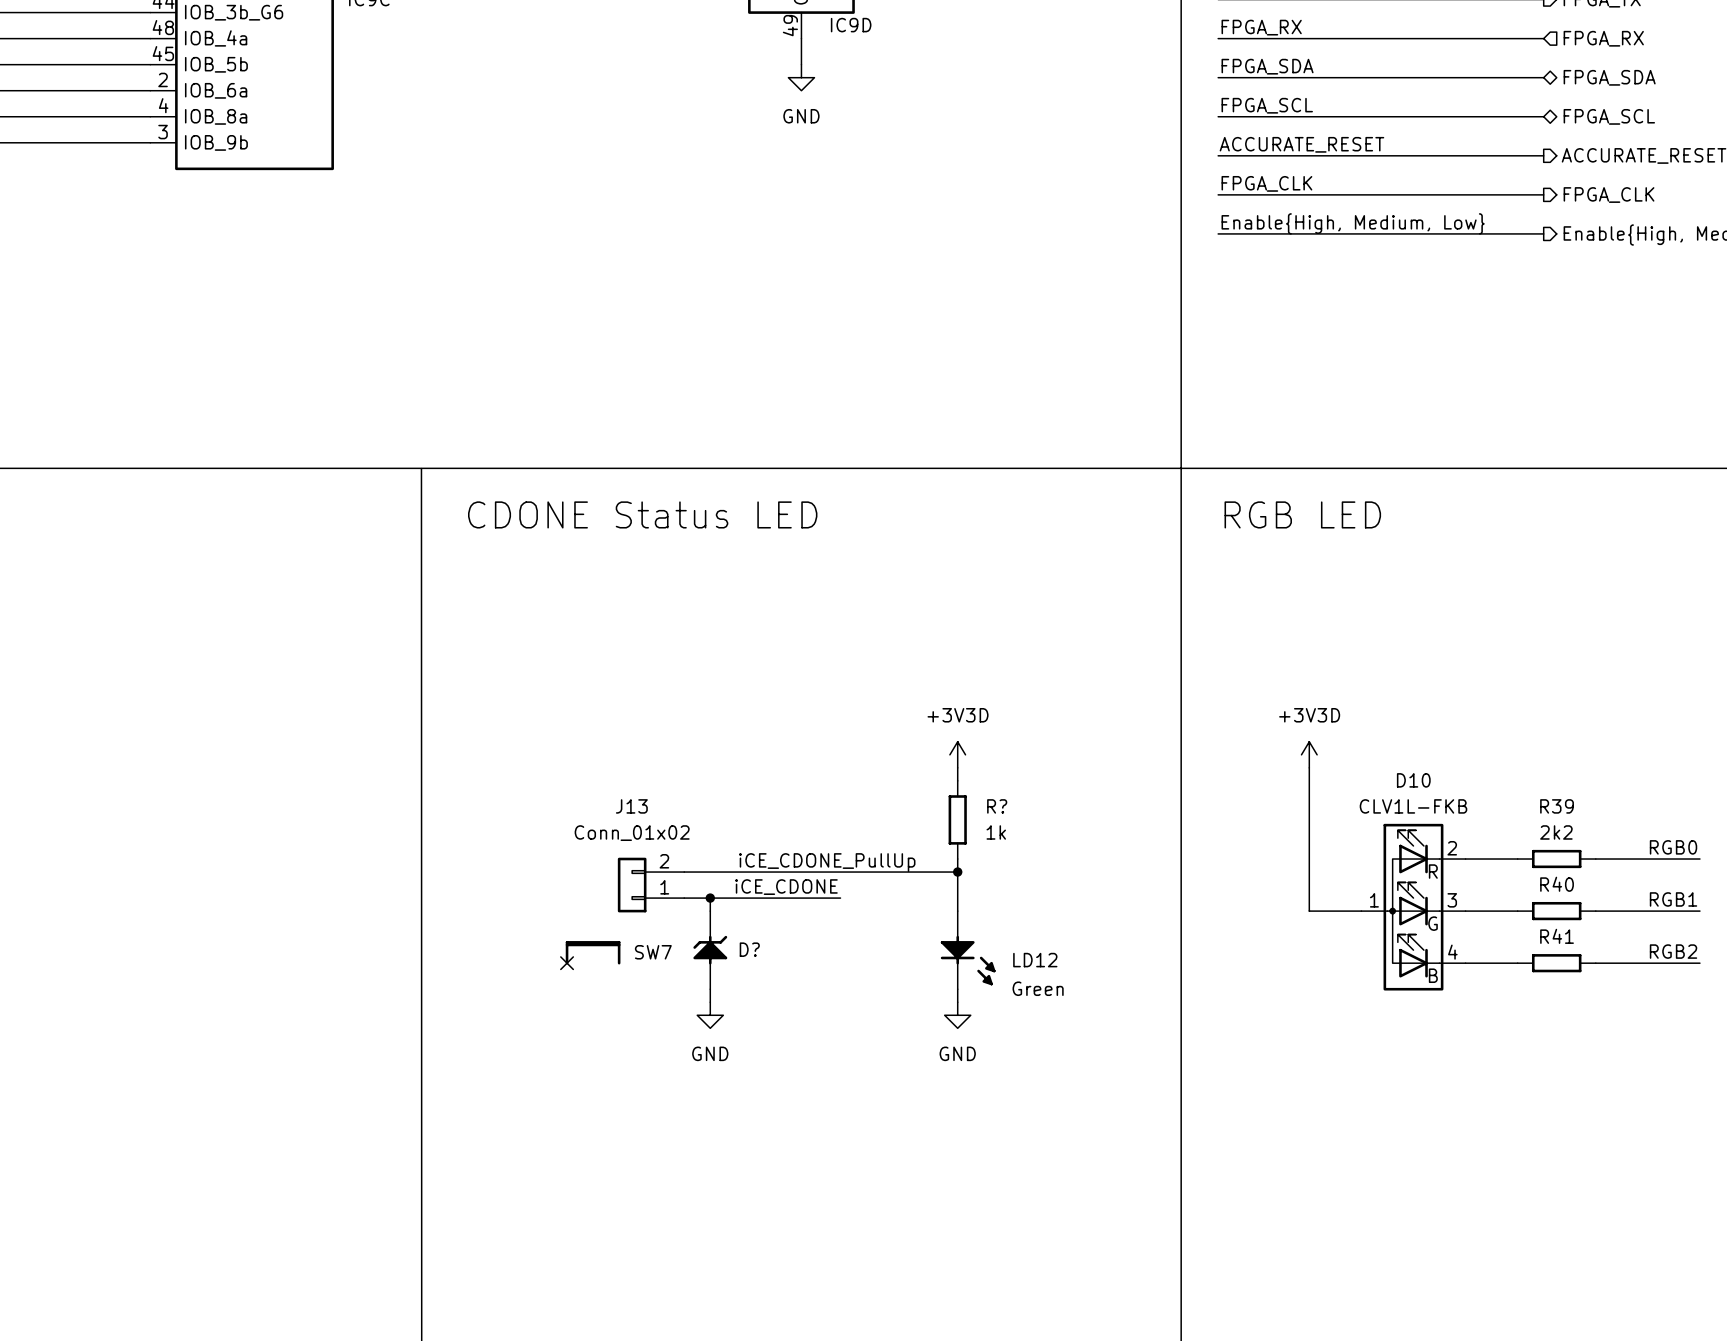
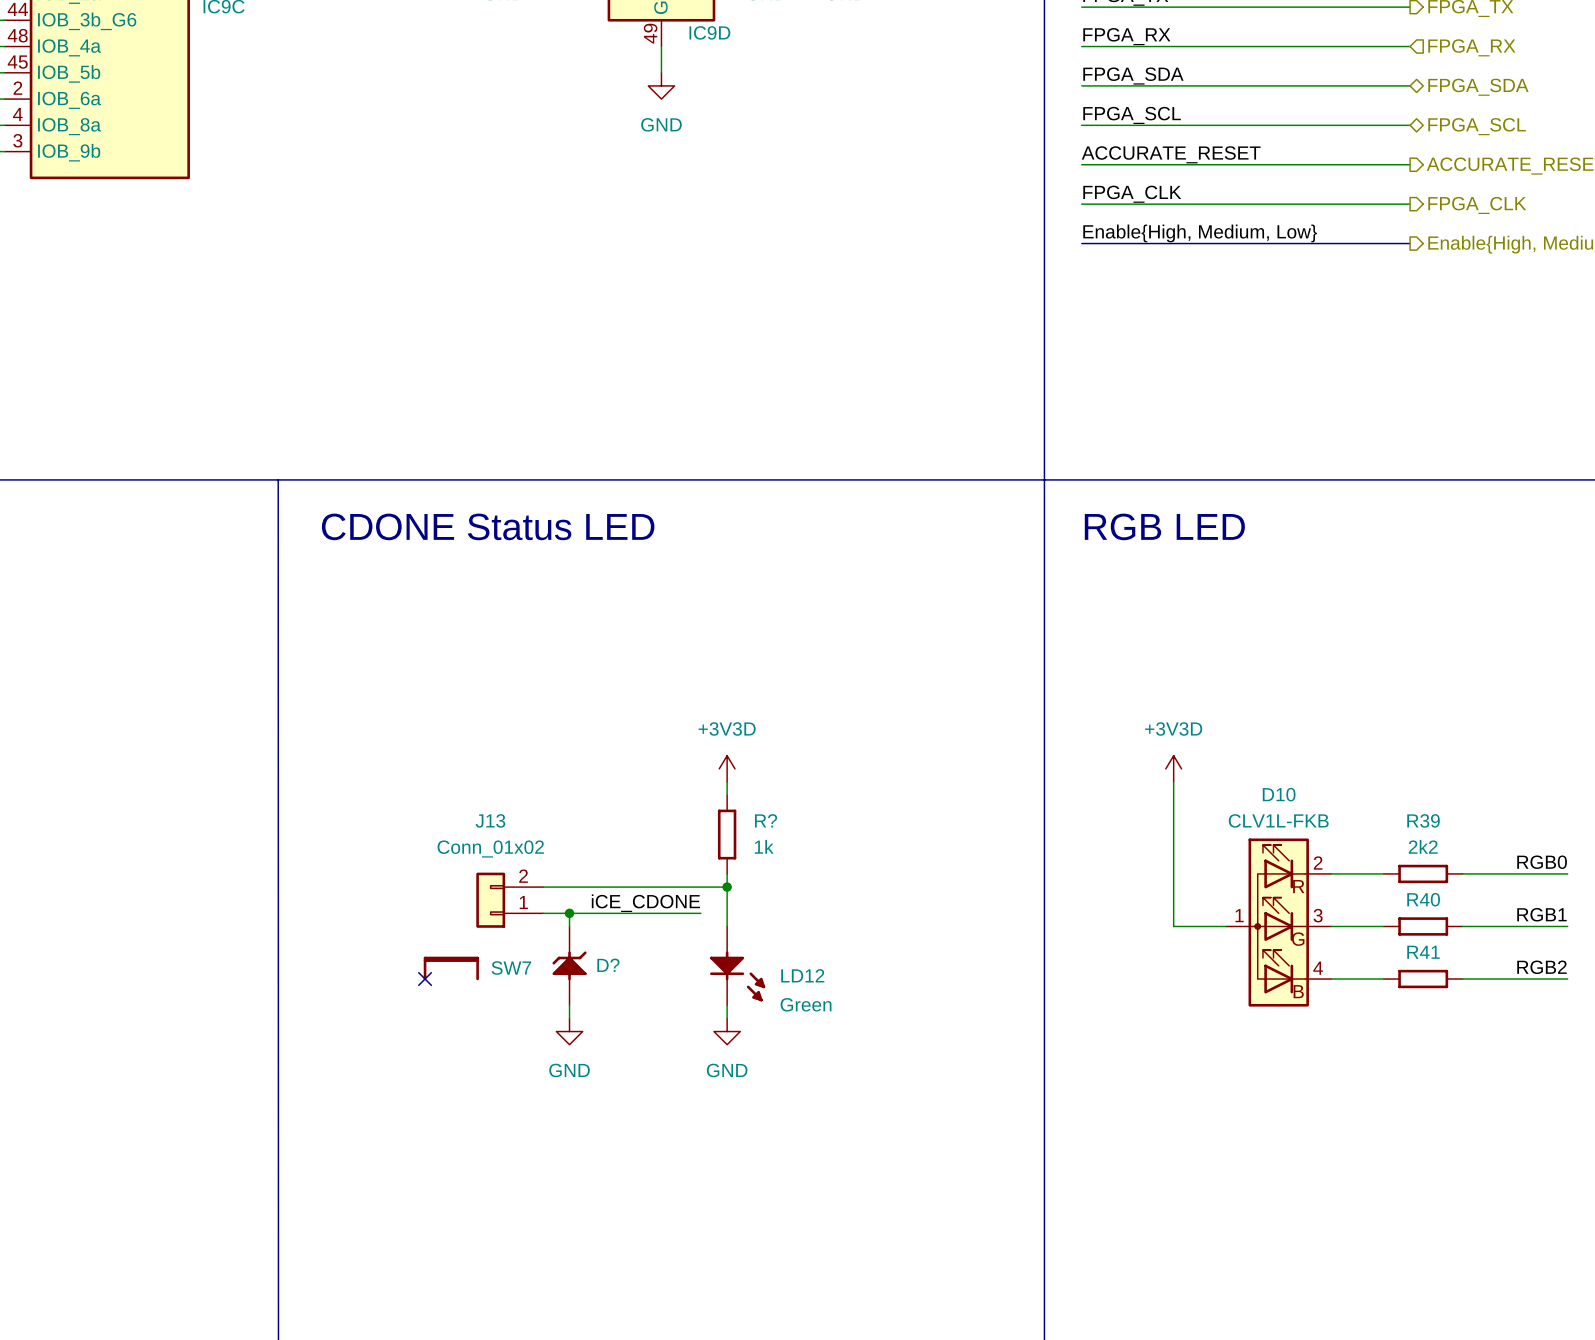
power symbol position: +3V3D (957, 754) -> +3V3D (727, 768)
wire: (957, 767) (957, 780) -> (727, 782) (727, 795)
R? position: (957, 819) -> (727, 834)
wire: (957, 859) (957, 911) -> (727, 873) (727, 926)
label: iCE_CDONE_PullUp (827, 862) -> none
wire: (866, 872) (957, 872) -> none
junction: none -> (727, 887)
junction: (957, 872) -> none
LD12 position: (968, 950) -> (737, 965)
wire: (957, 989) (957, 1002) -> (727, 1005) (727, 1018)
power symbol position: GND (957, 1015) -> GND (727, 1031)

